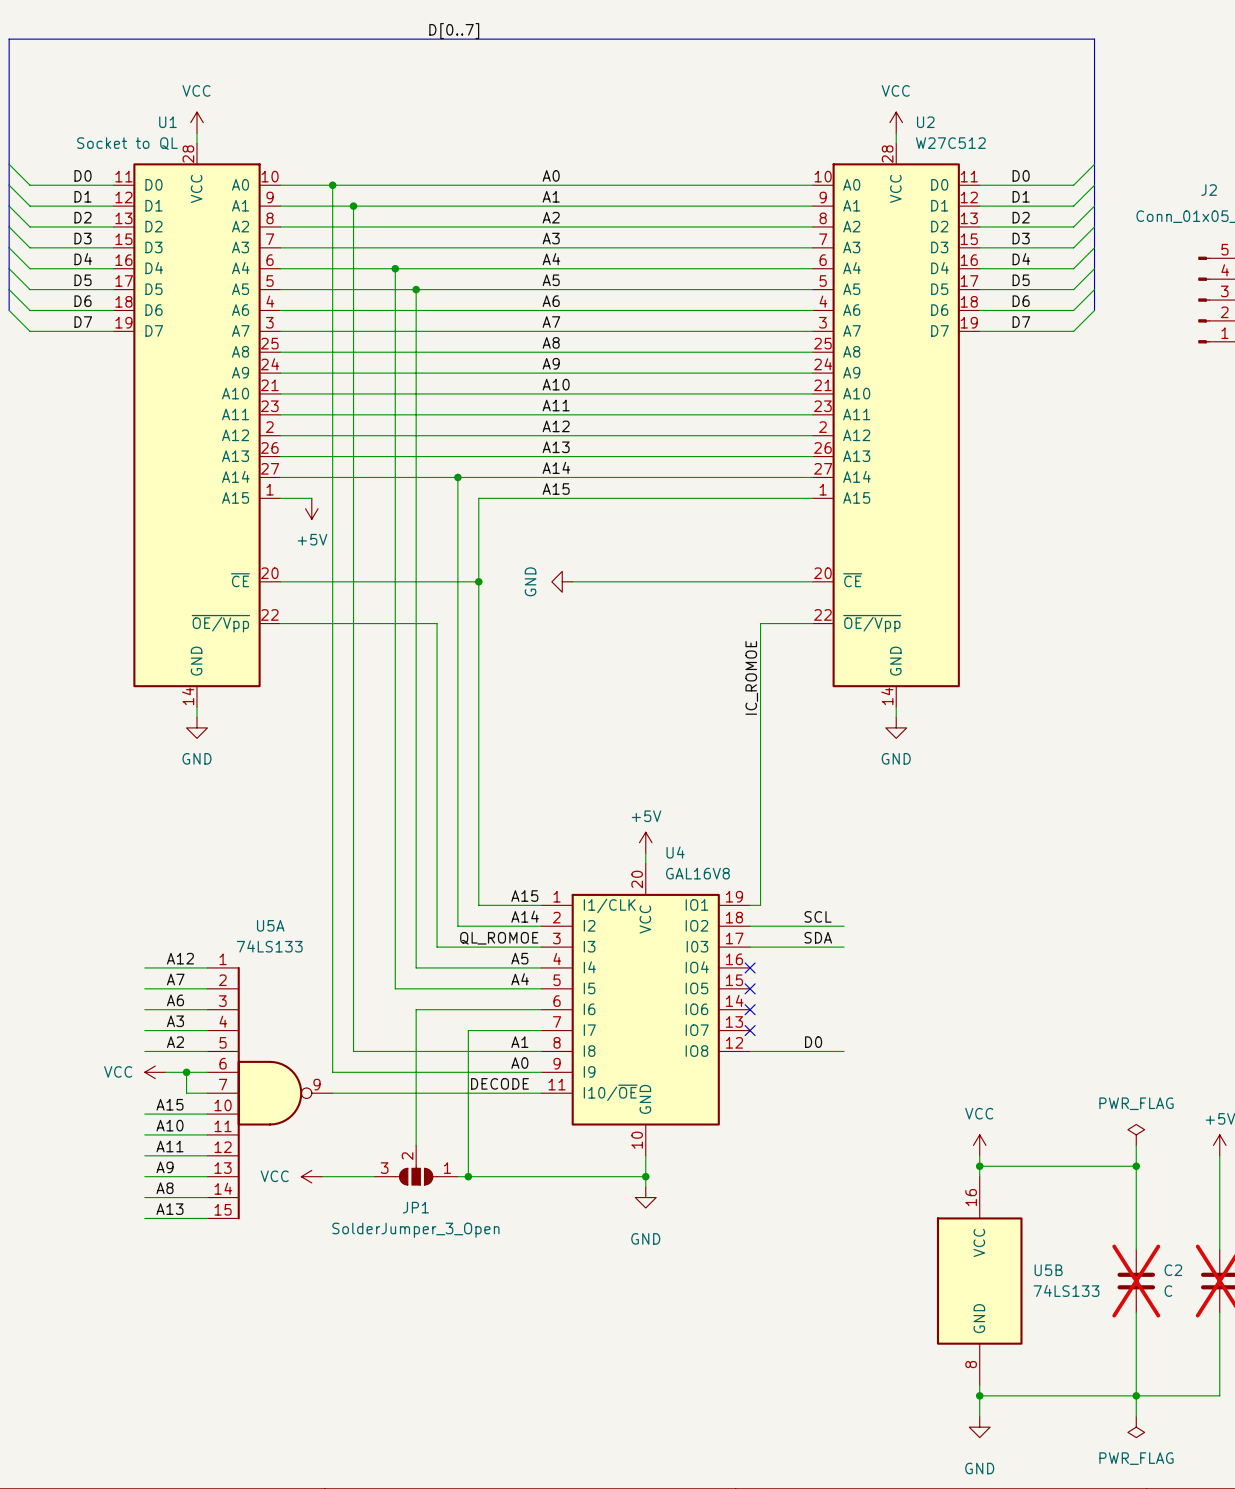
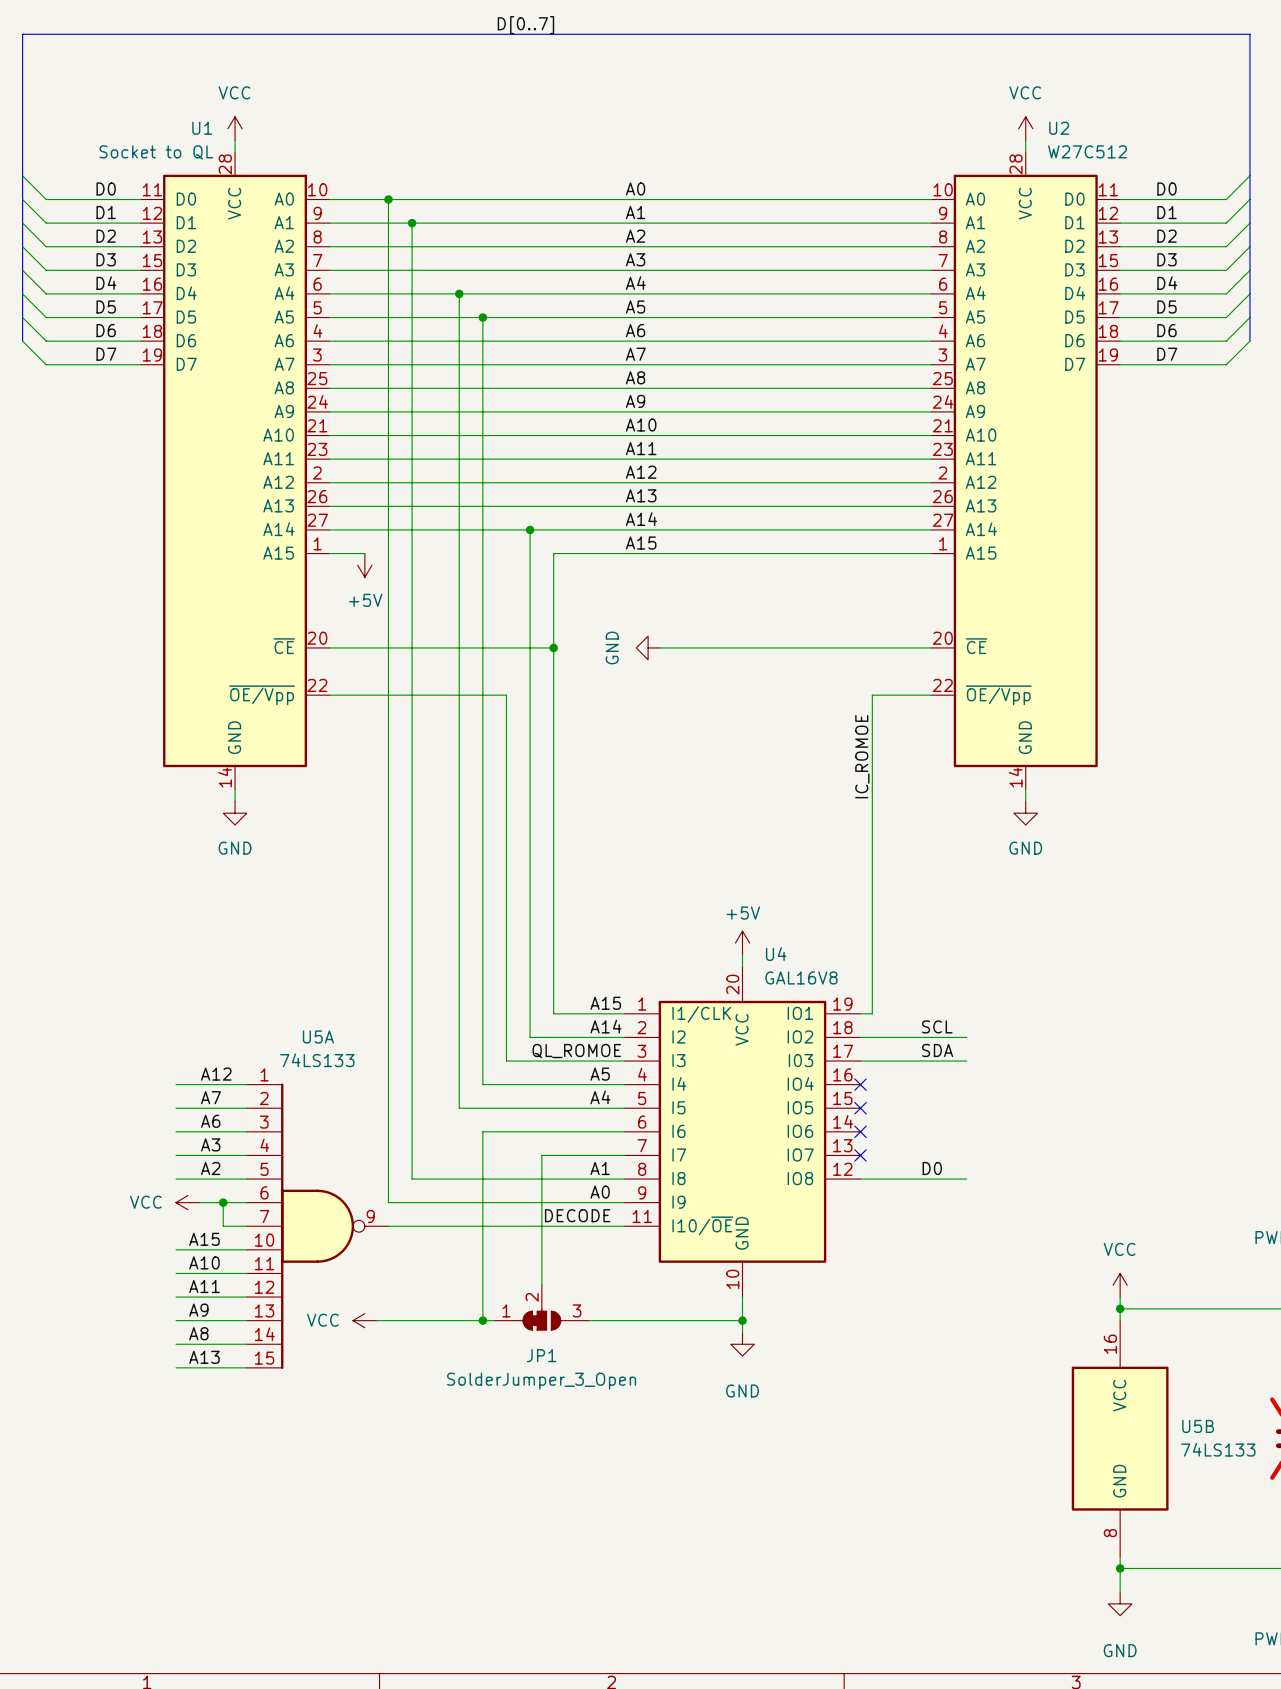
JP1 symbol: [374, 1145, 458, 1186] -> [494, 1285, 590, 1331]
junction: none -> (482, 1320)
junction: (468, 1176) -> none

